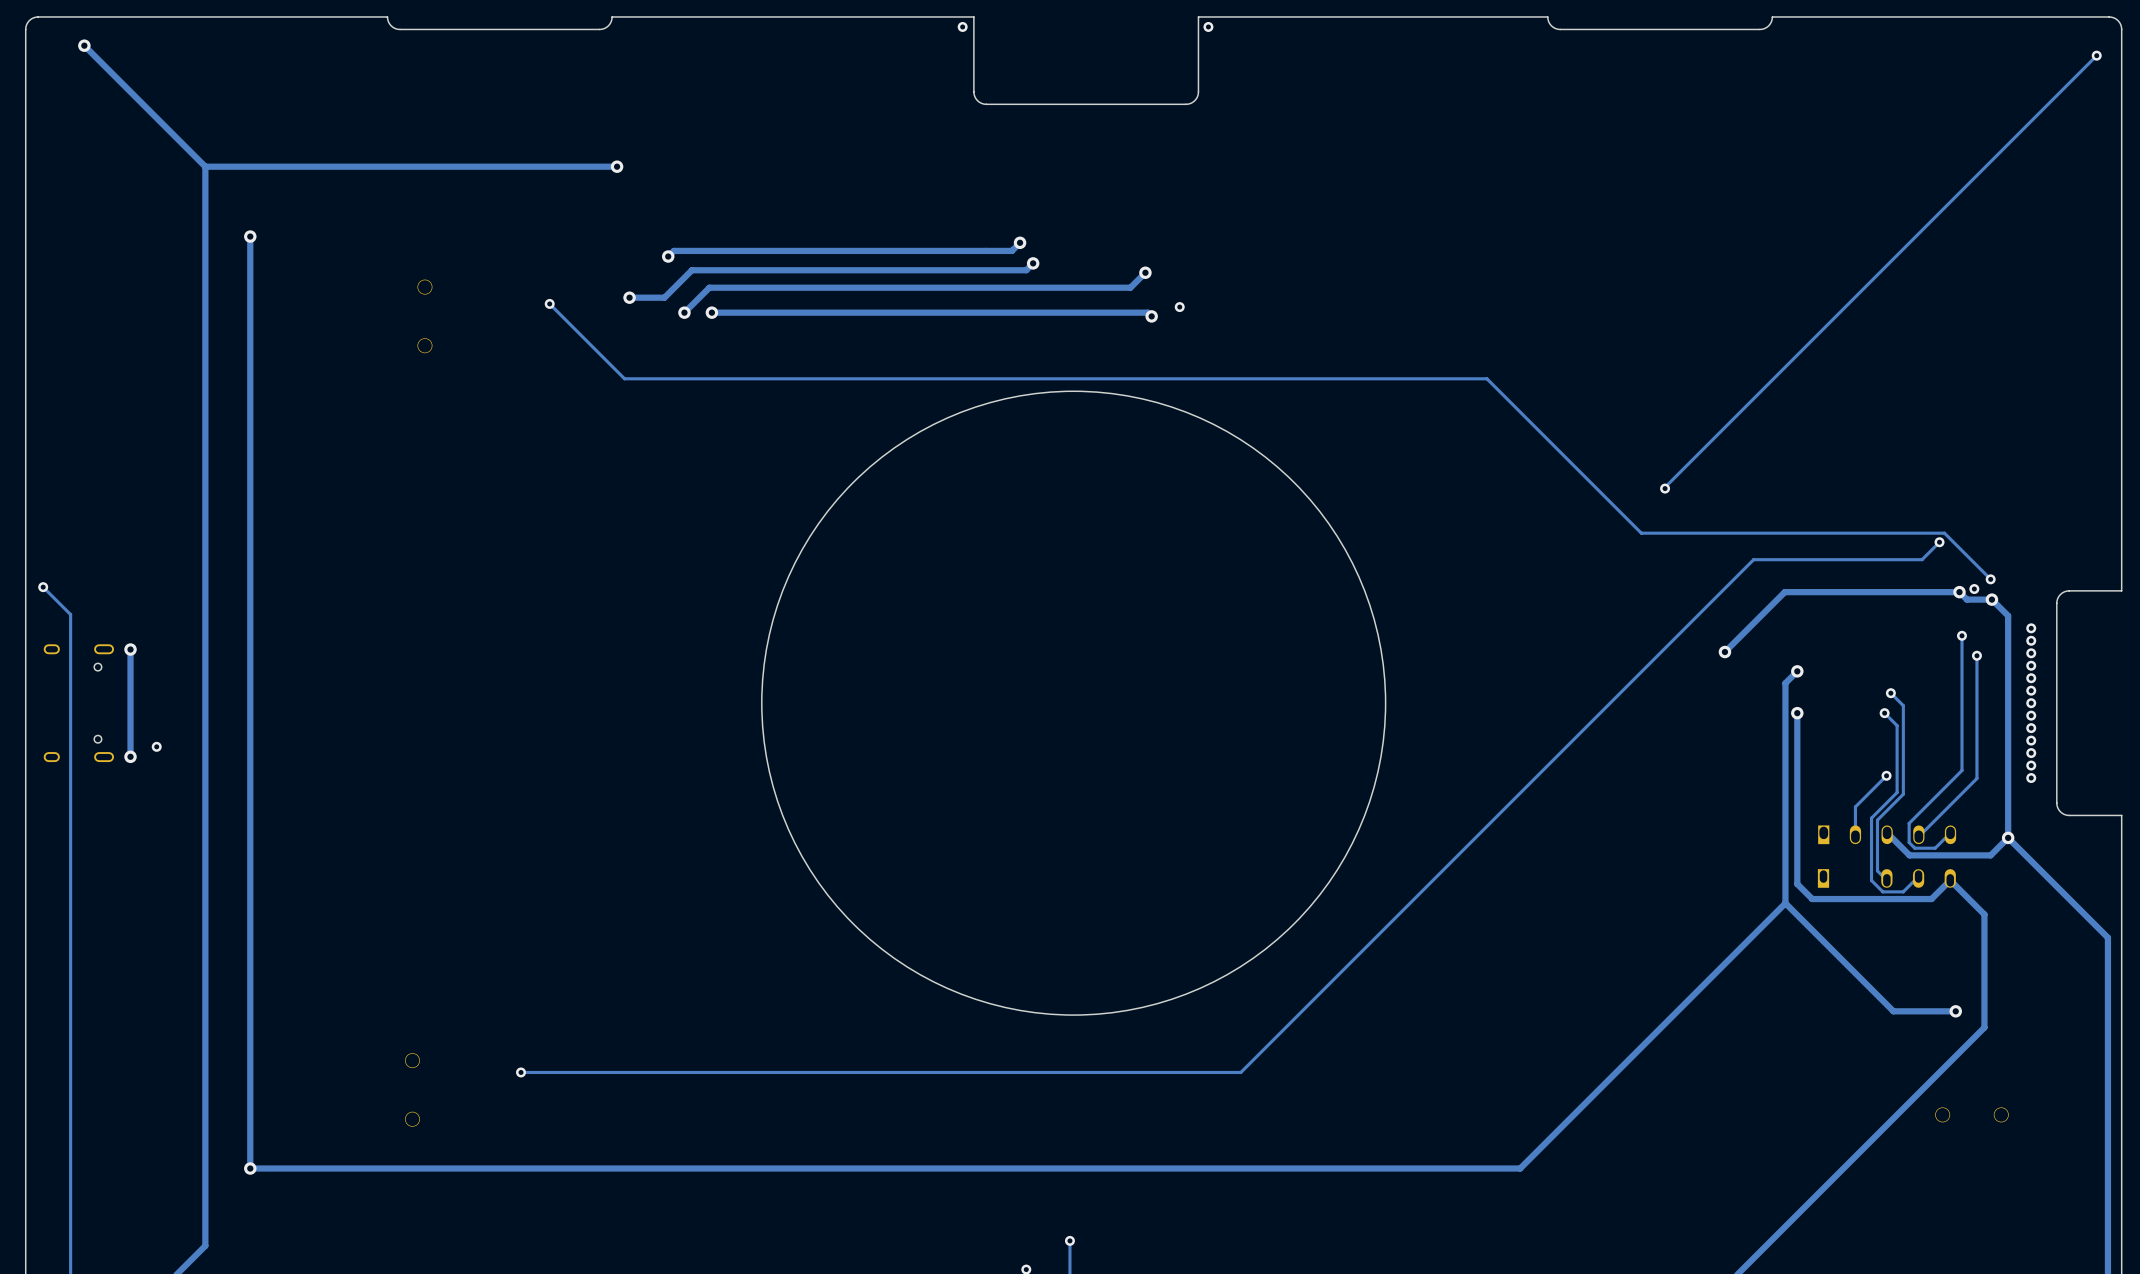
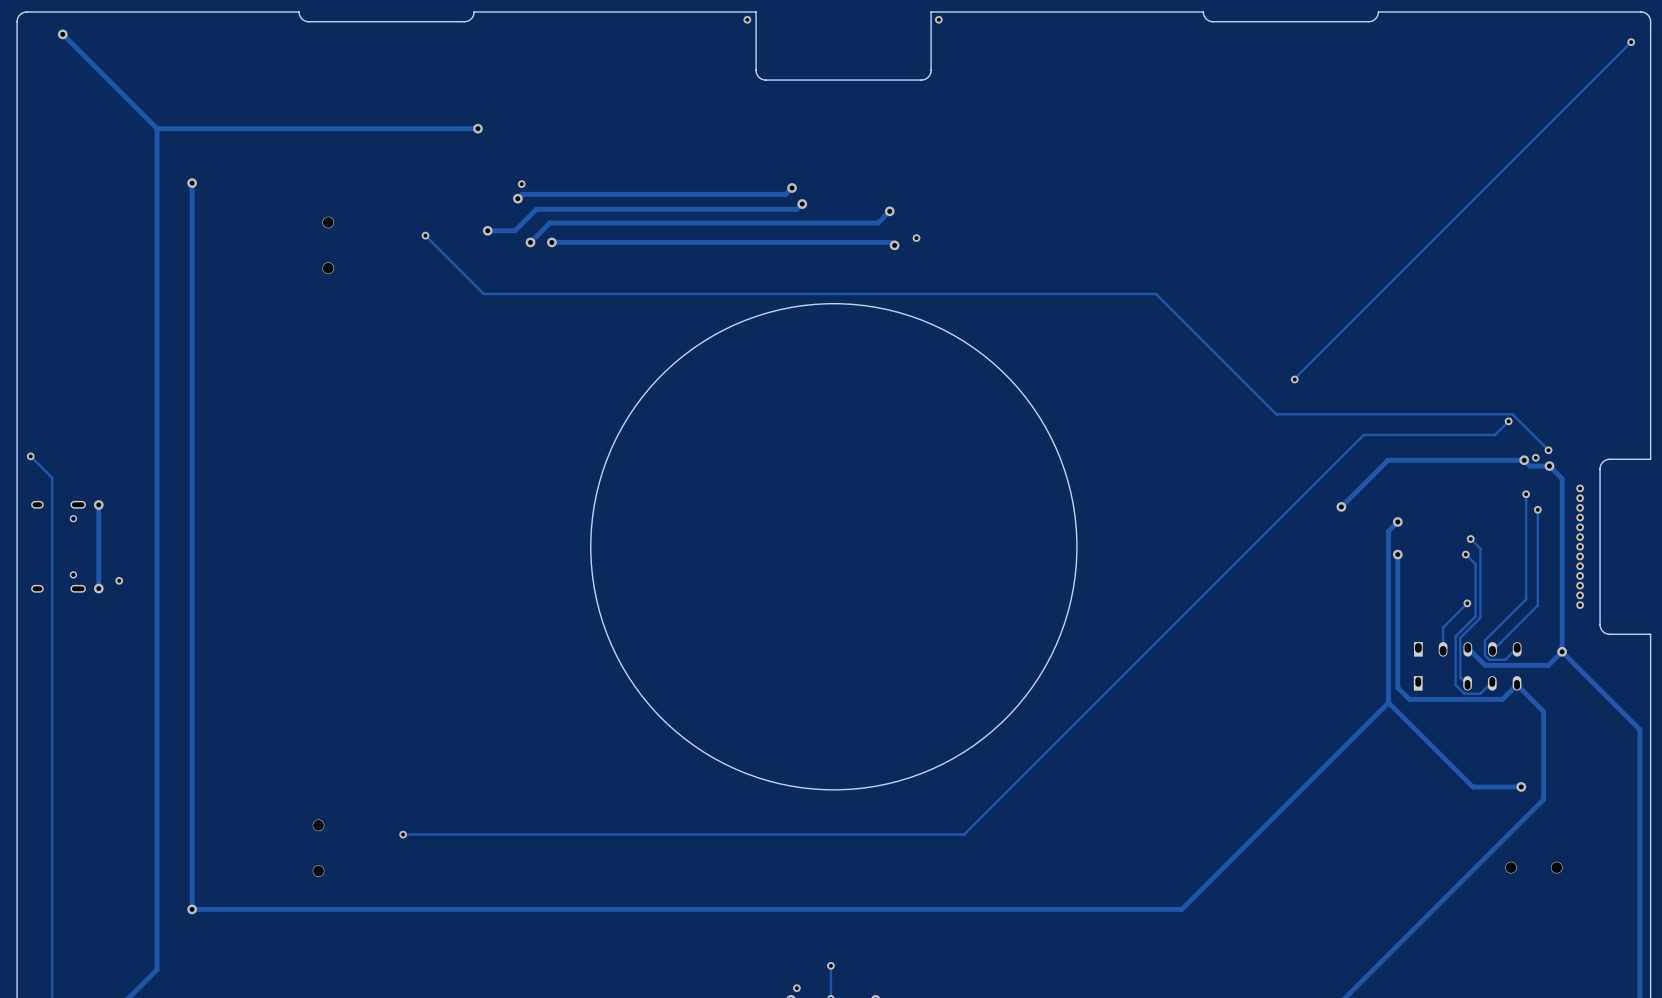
via: none -> (521, 184)

